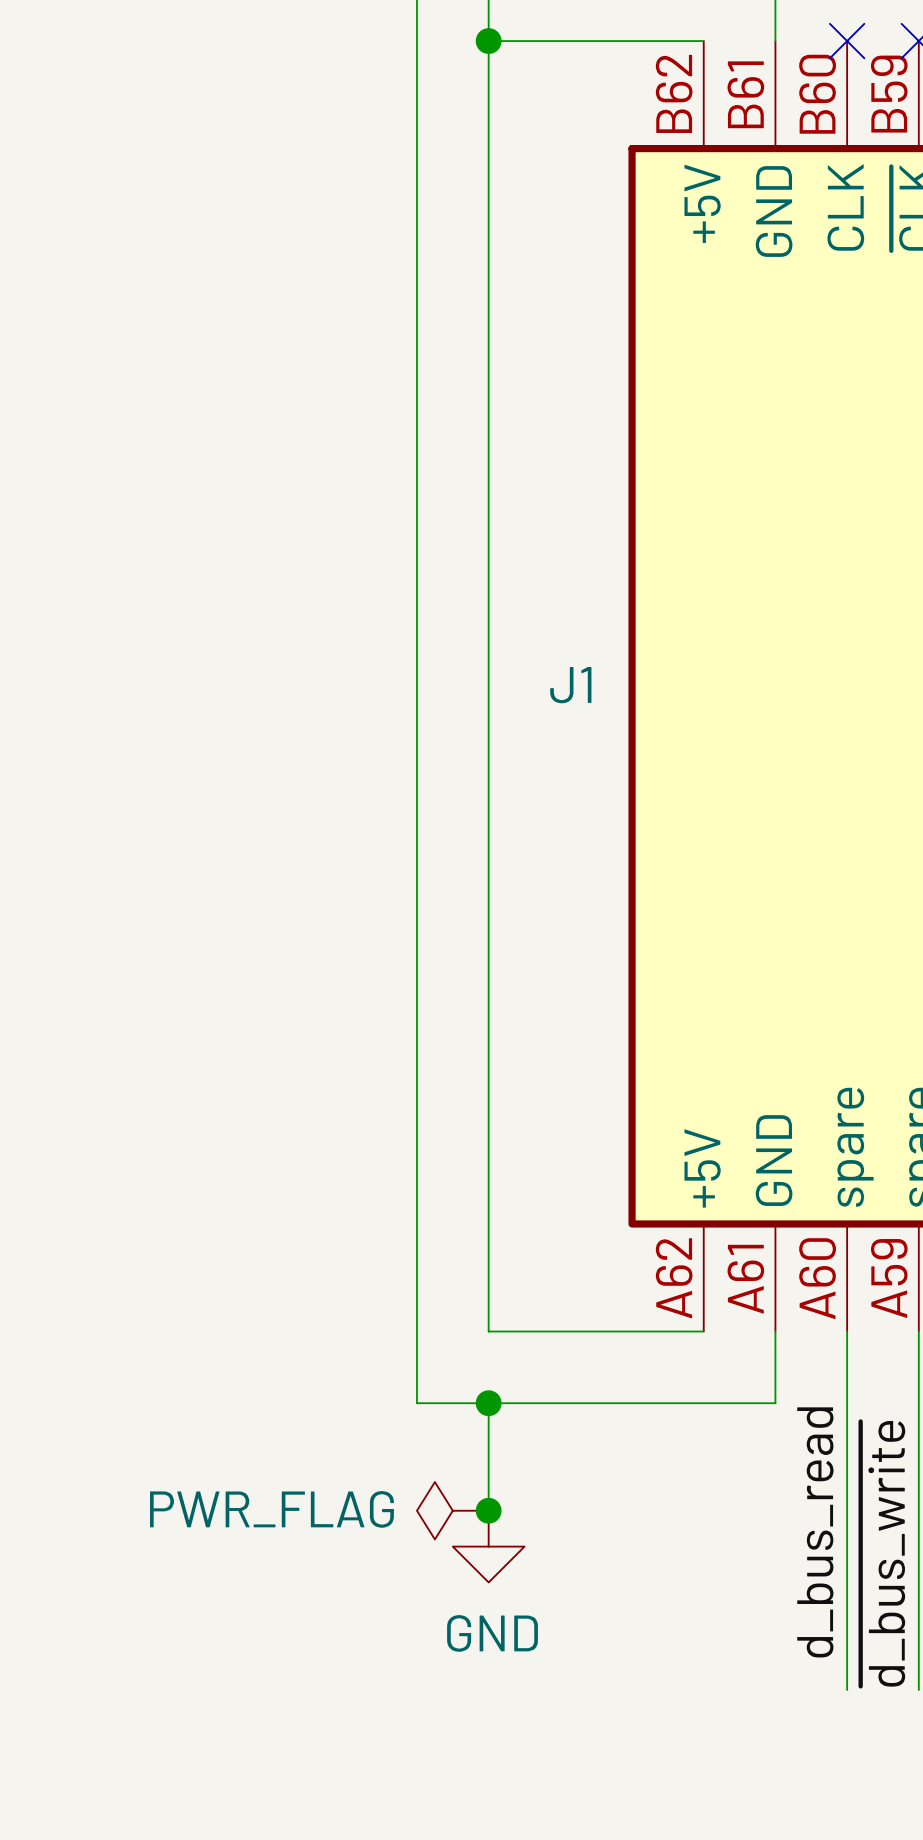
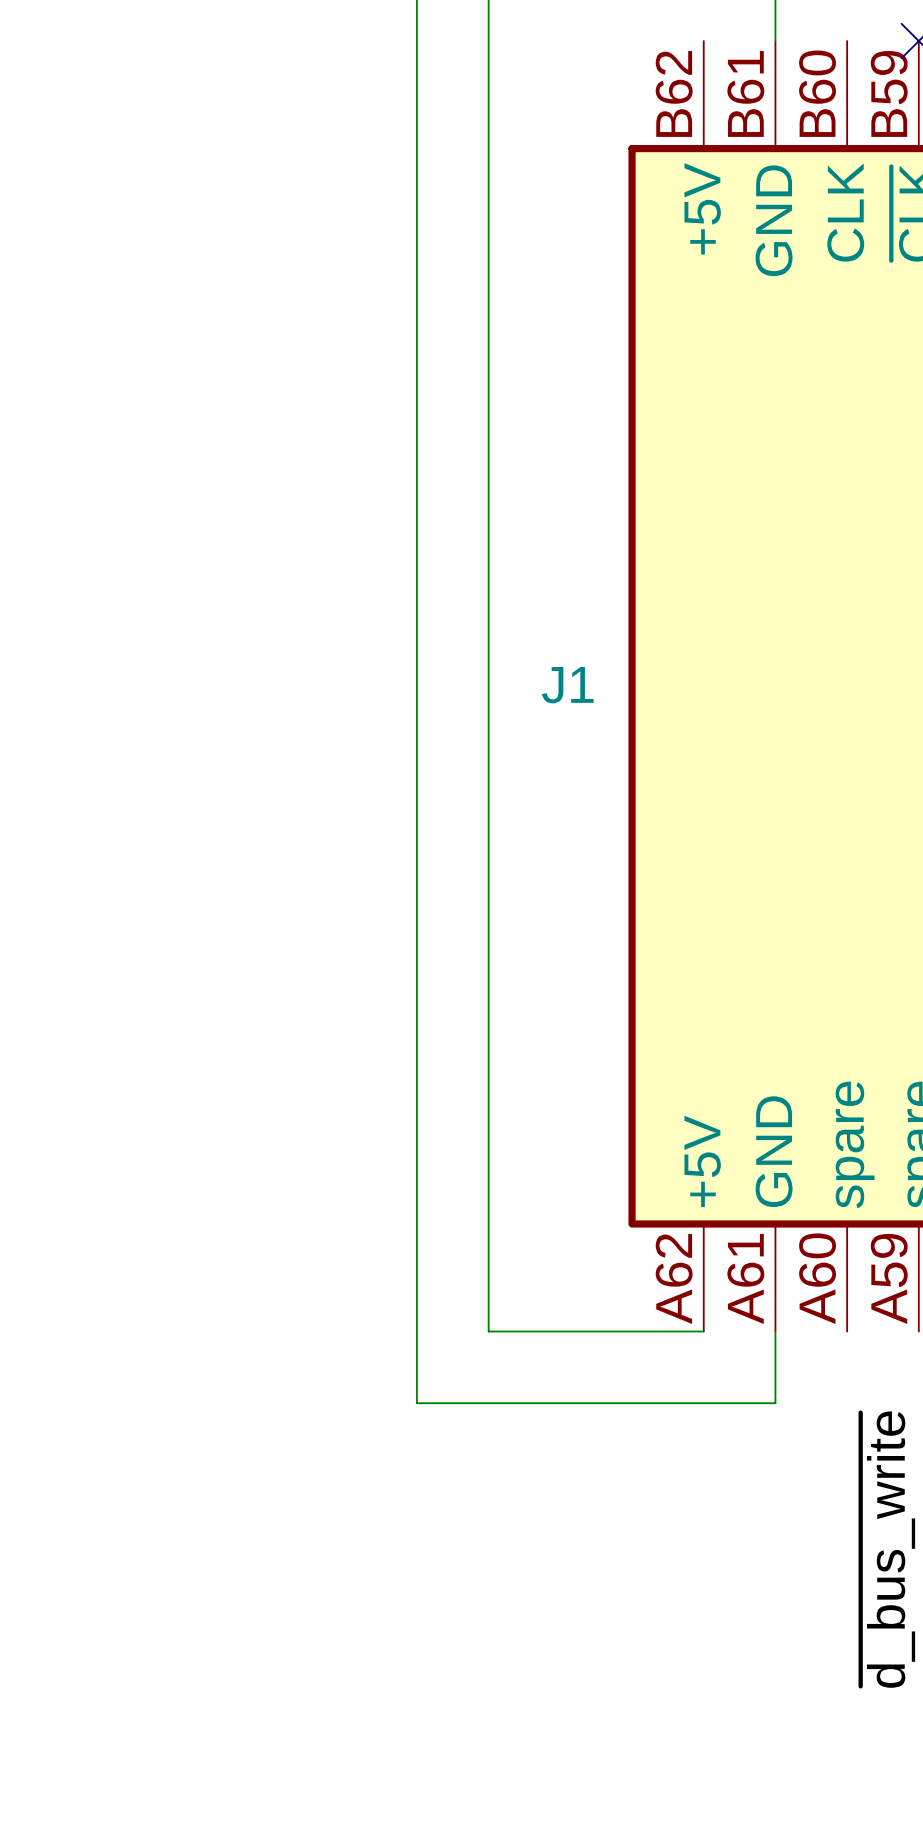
wire: (488, 41) (703, 41) -> none
junction: (488, 41) -> none
no-connect mark: (847, 41) -> none
wire: (847, 1331) (847, 1689) -> none
wire: (918, 1331) (918, 1689) -> none
wire: (488, 1403) (488, 1510) -> none
junction: (488, 1403) -> none
power symbol: PWR_FLAG (452, 1510) -> none
junction: (488, 1510) -> none
label: d_bus_read (815, 1532) -> none
power symbol: GND (488, 1546) -> none

